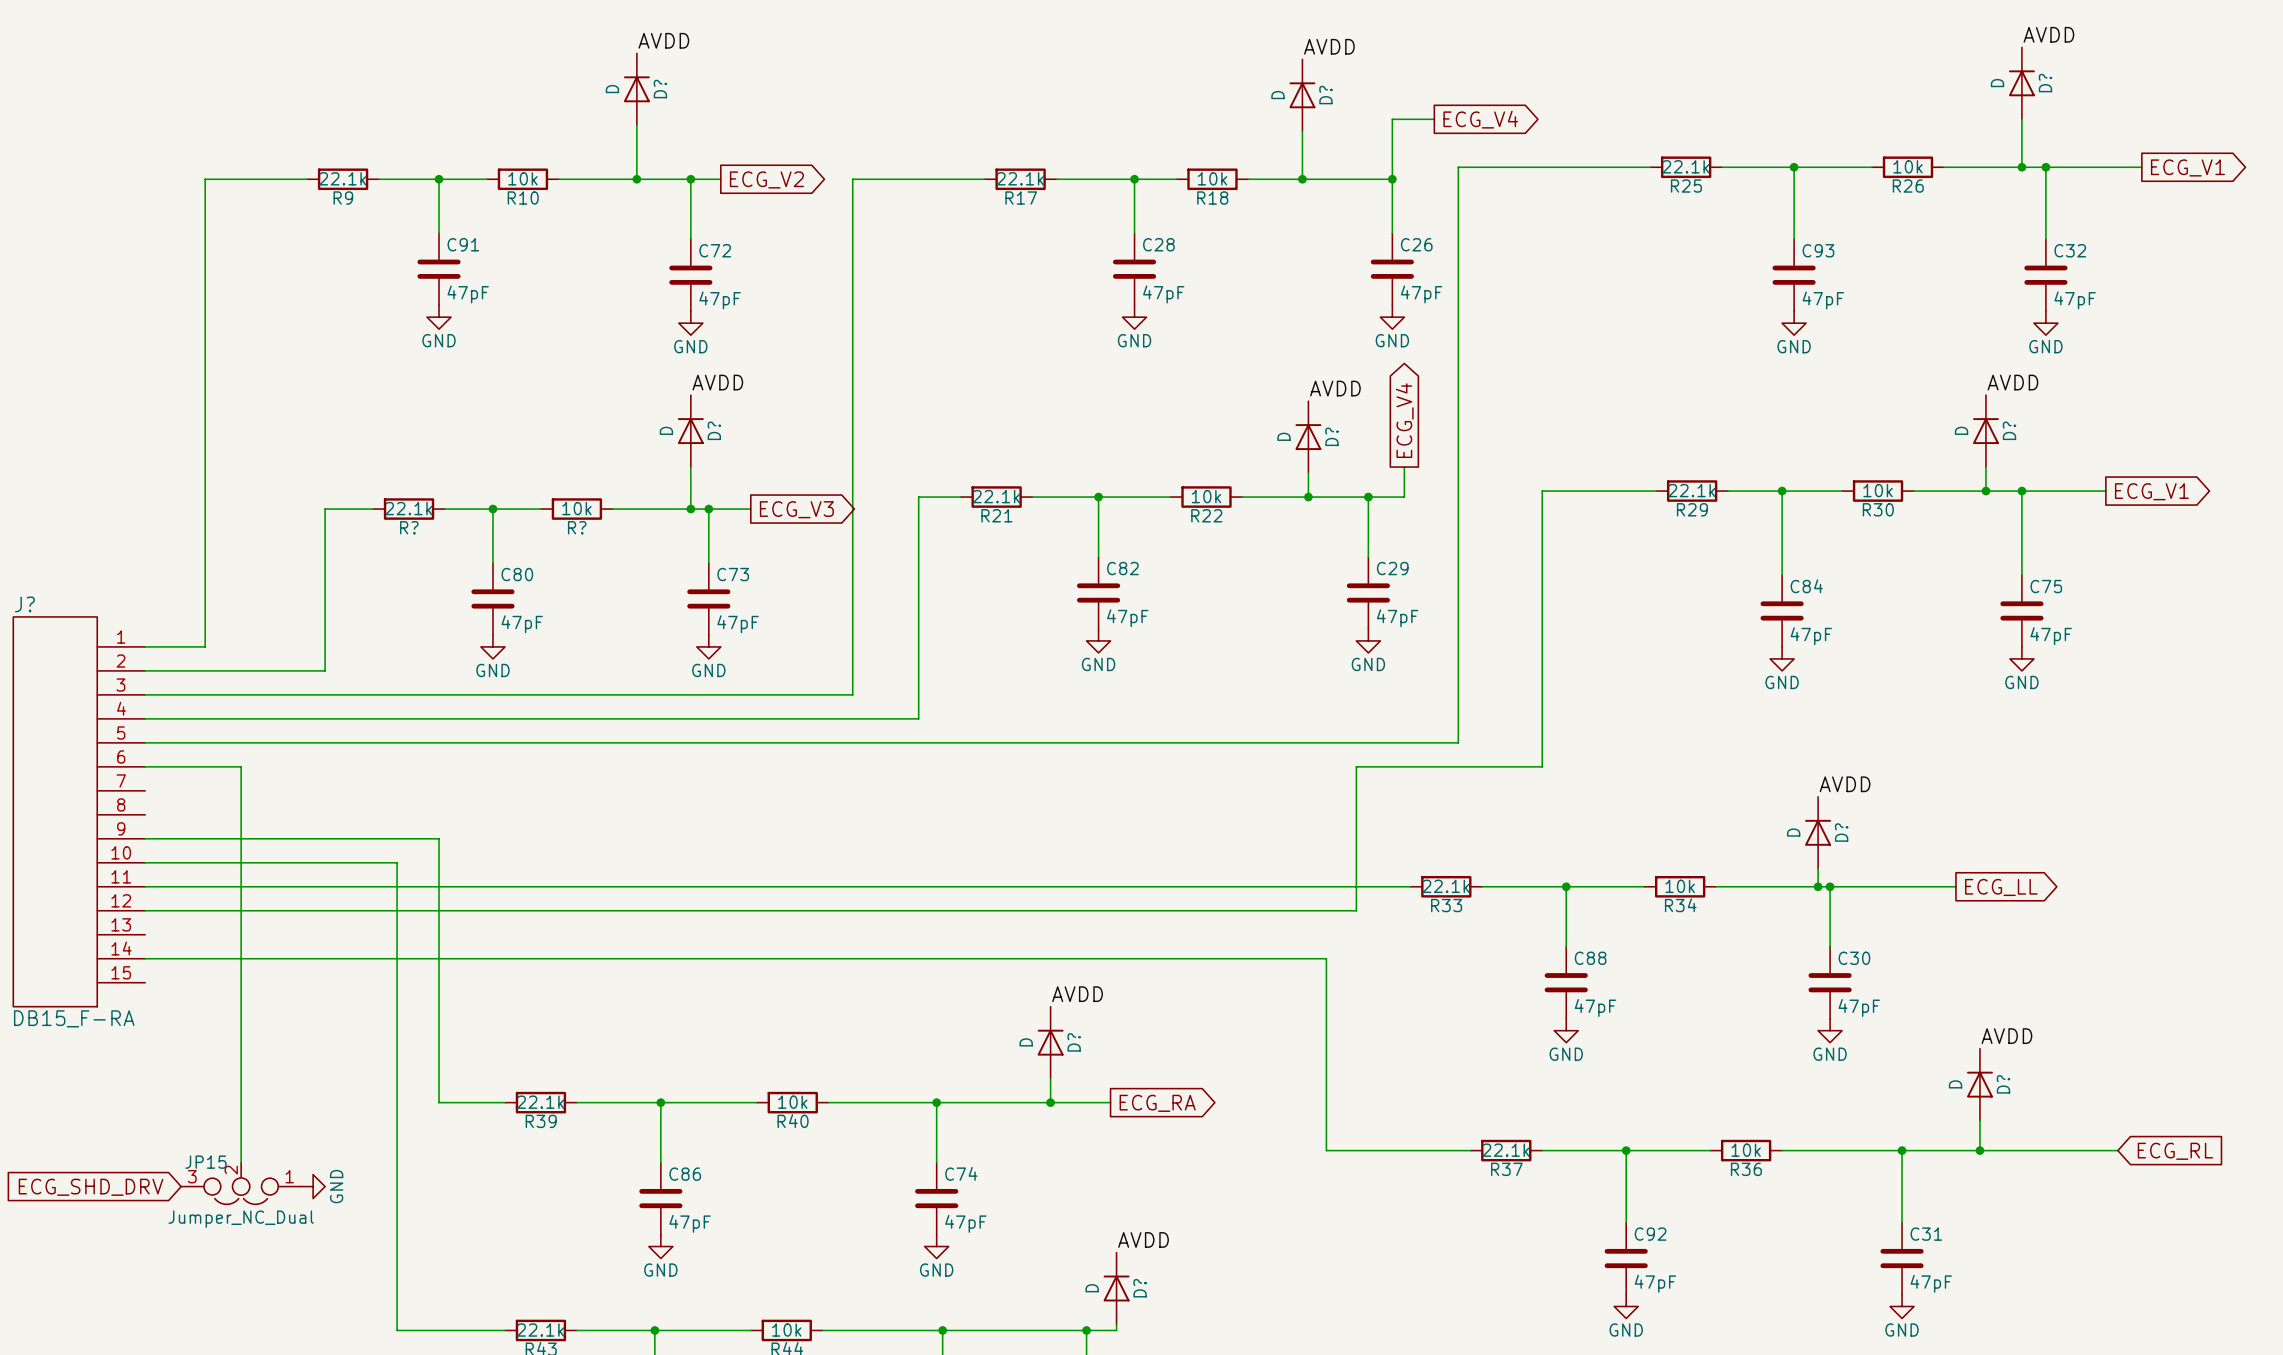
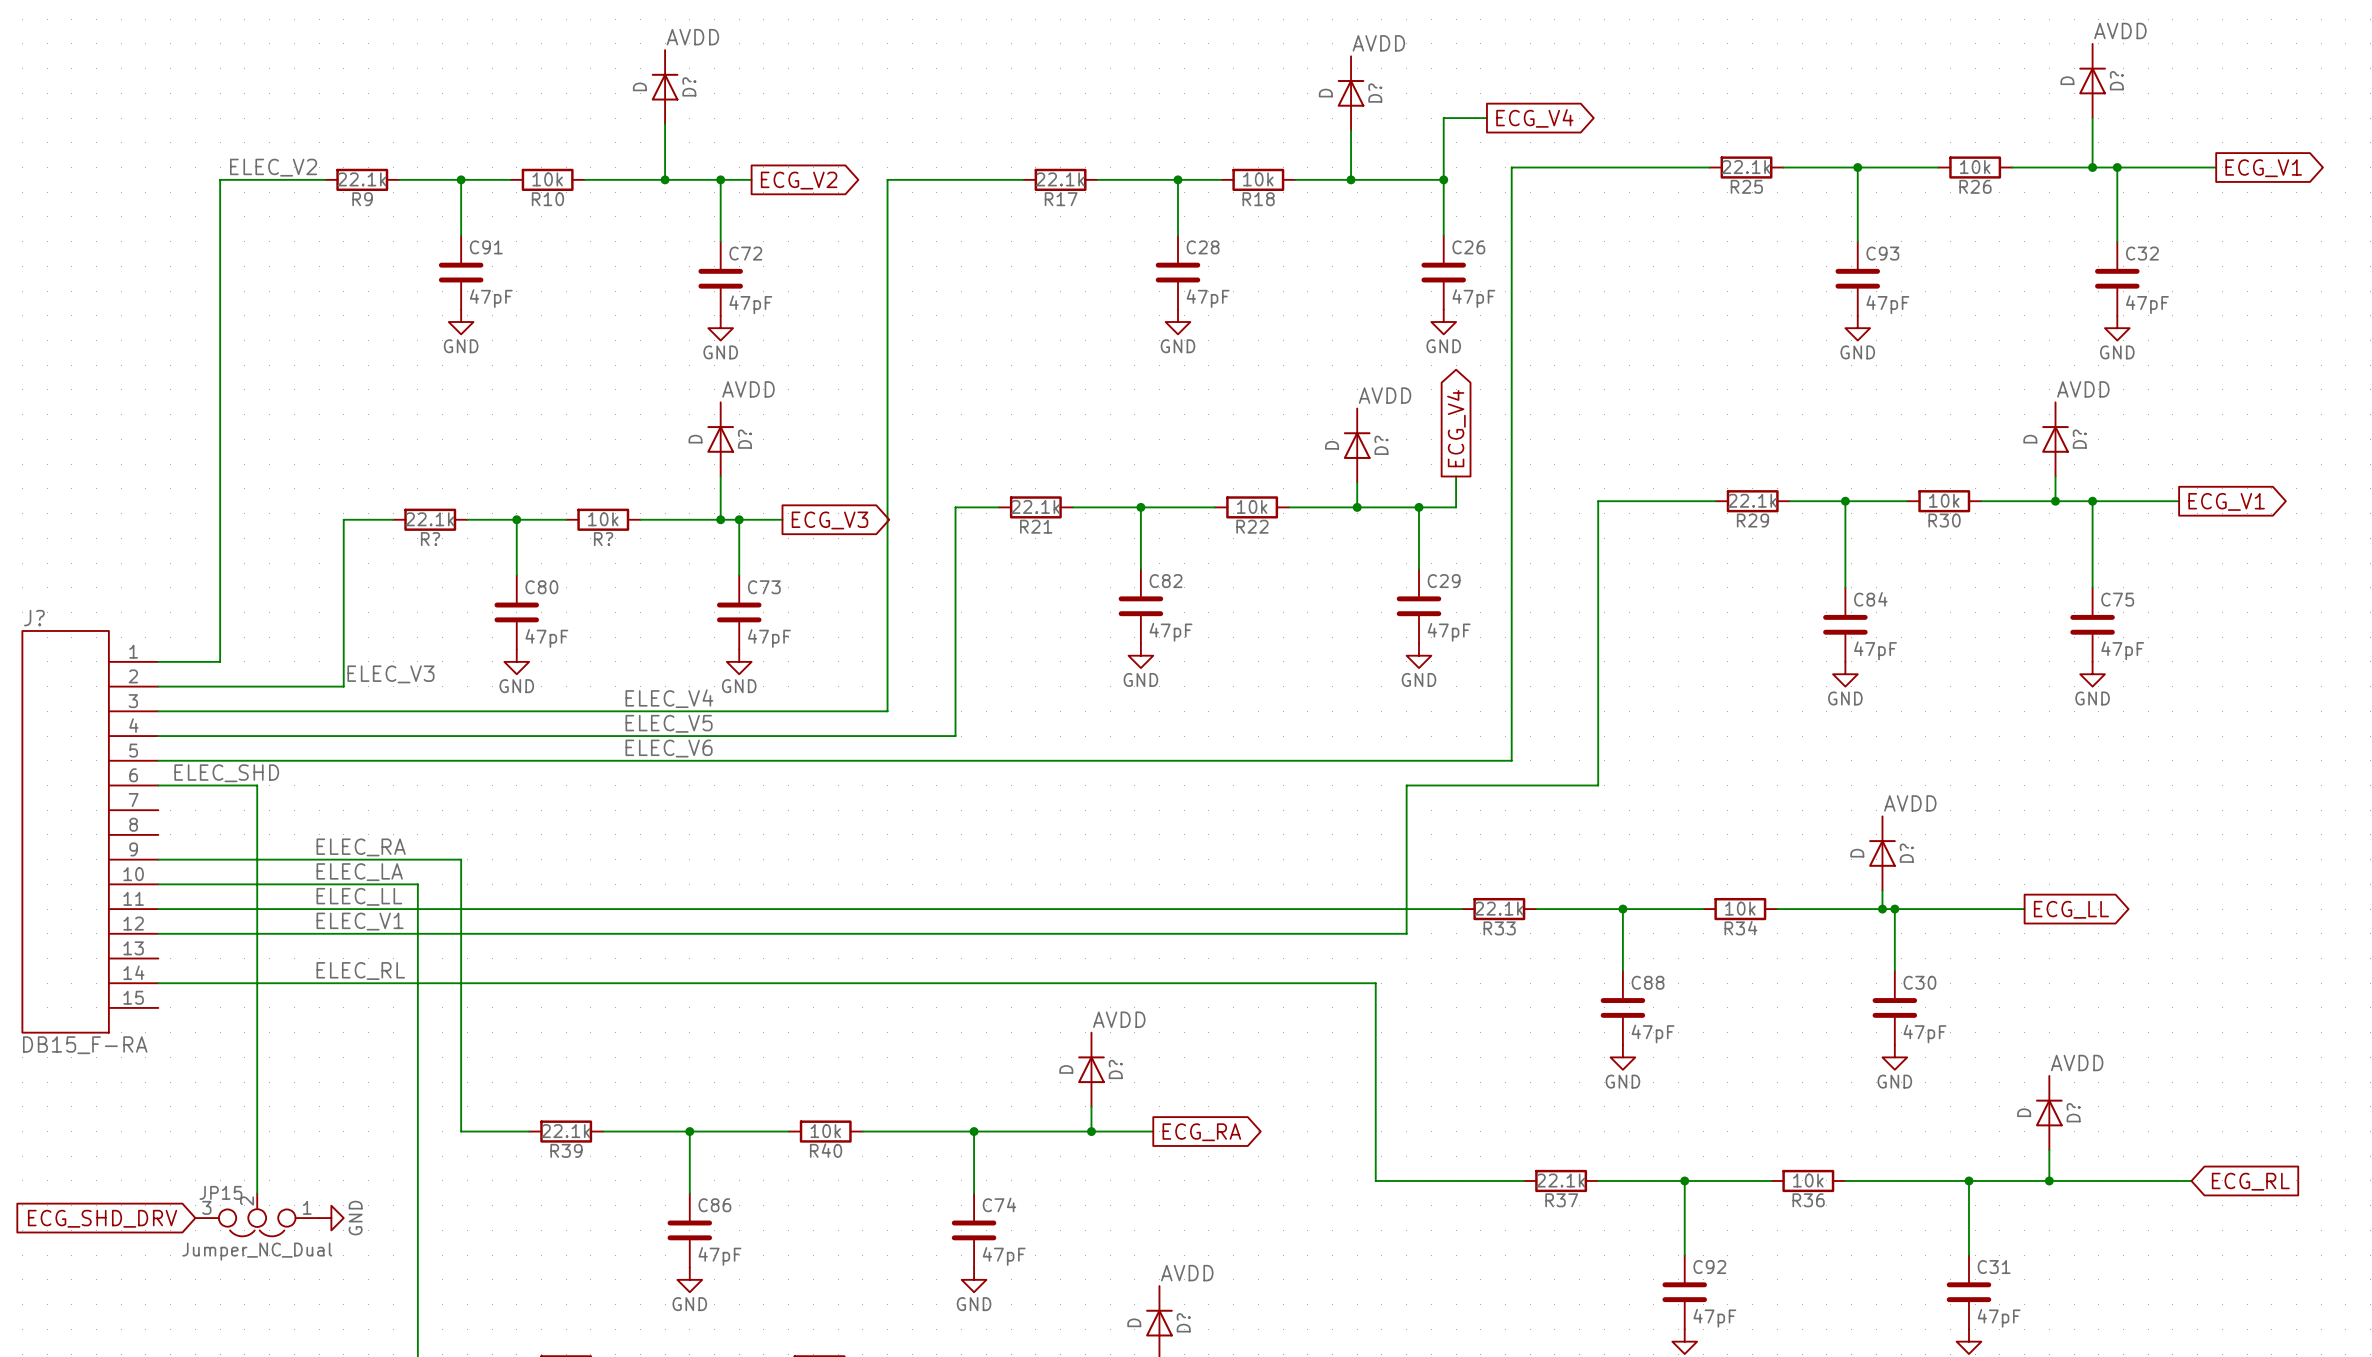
label: none -> ELEC_V2 (273, 167)
label: none -> ELEC_V3 (390, 674)
label: none -> ELEC_V4 (669, 698)
label: none -> ELEC_V5 (669, 723)
label: none -> ELEC_V6 (669, 748)
label: none -> ELEC_SHD (226, 773)
label: none -> ELEC_RA (361, 847)
label: none -> ELEC_LA (359, 872)
label: none -> ELEC_LL (359, 896)
label: none -> ELEC_V1 (360, 921)
label: none -> ELEC_RL (360, 971)

